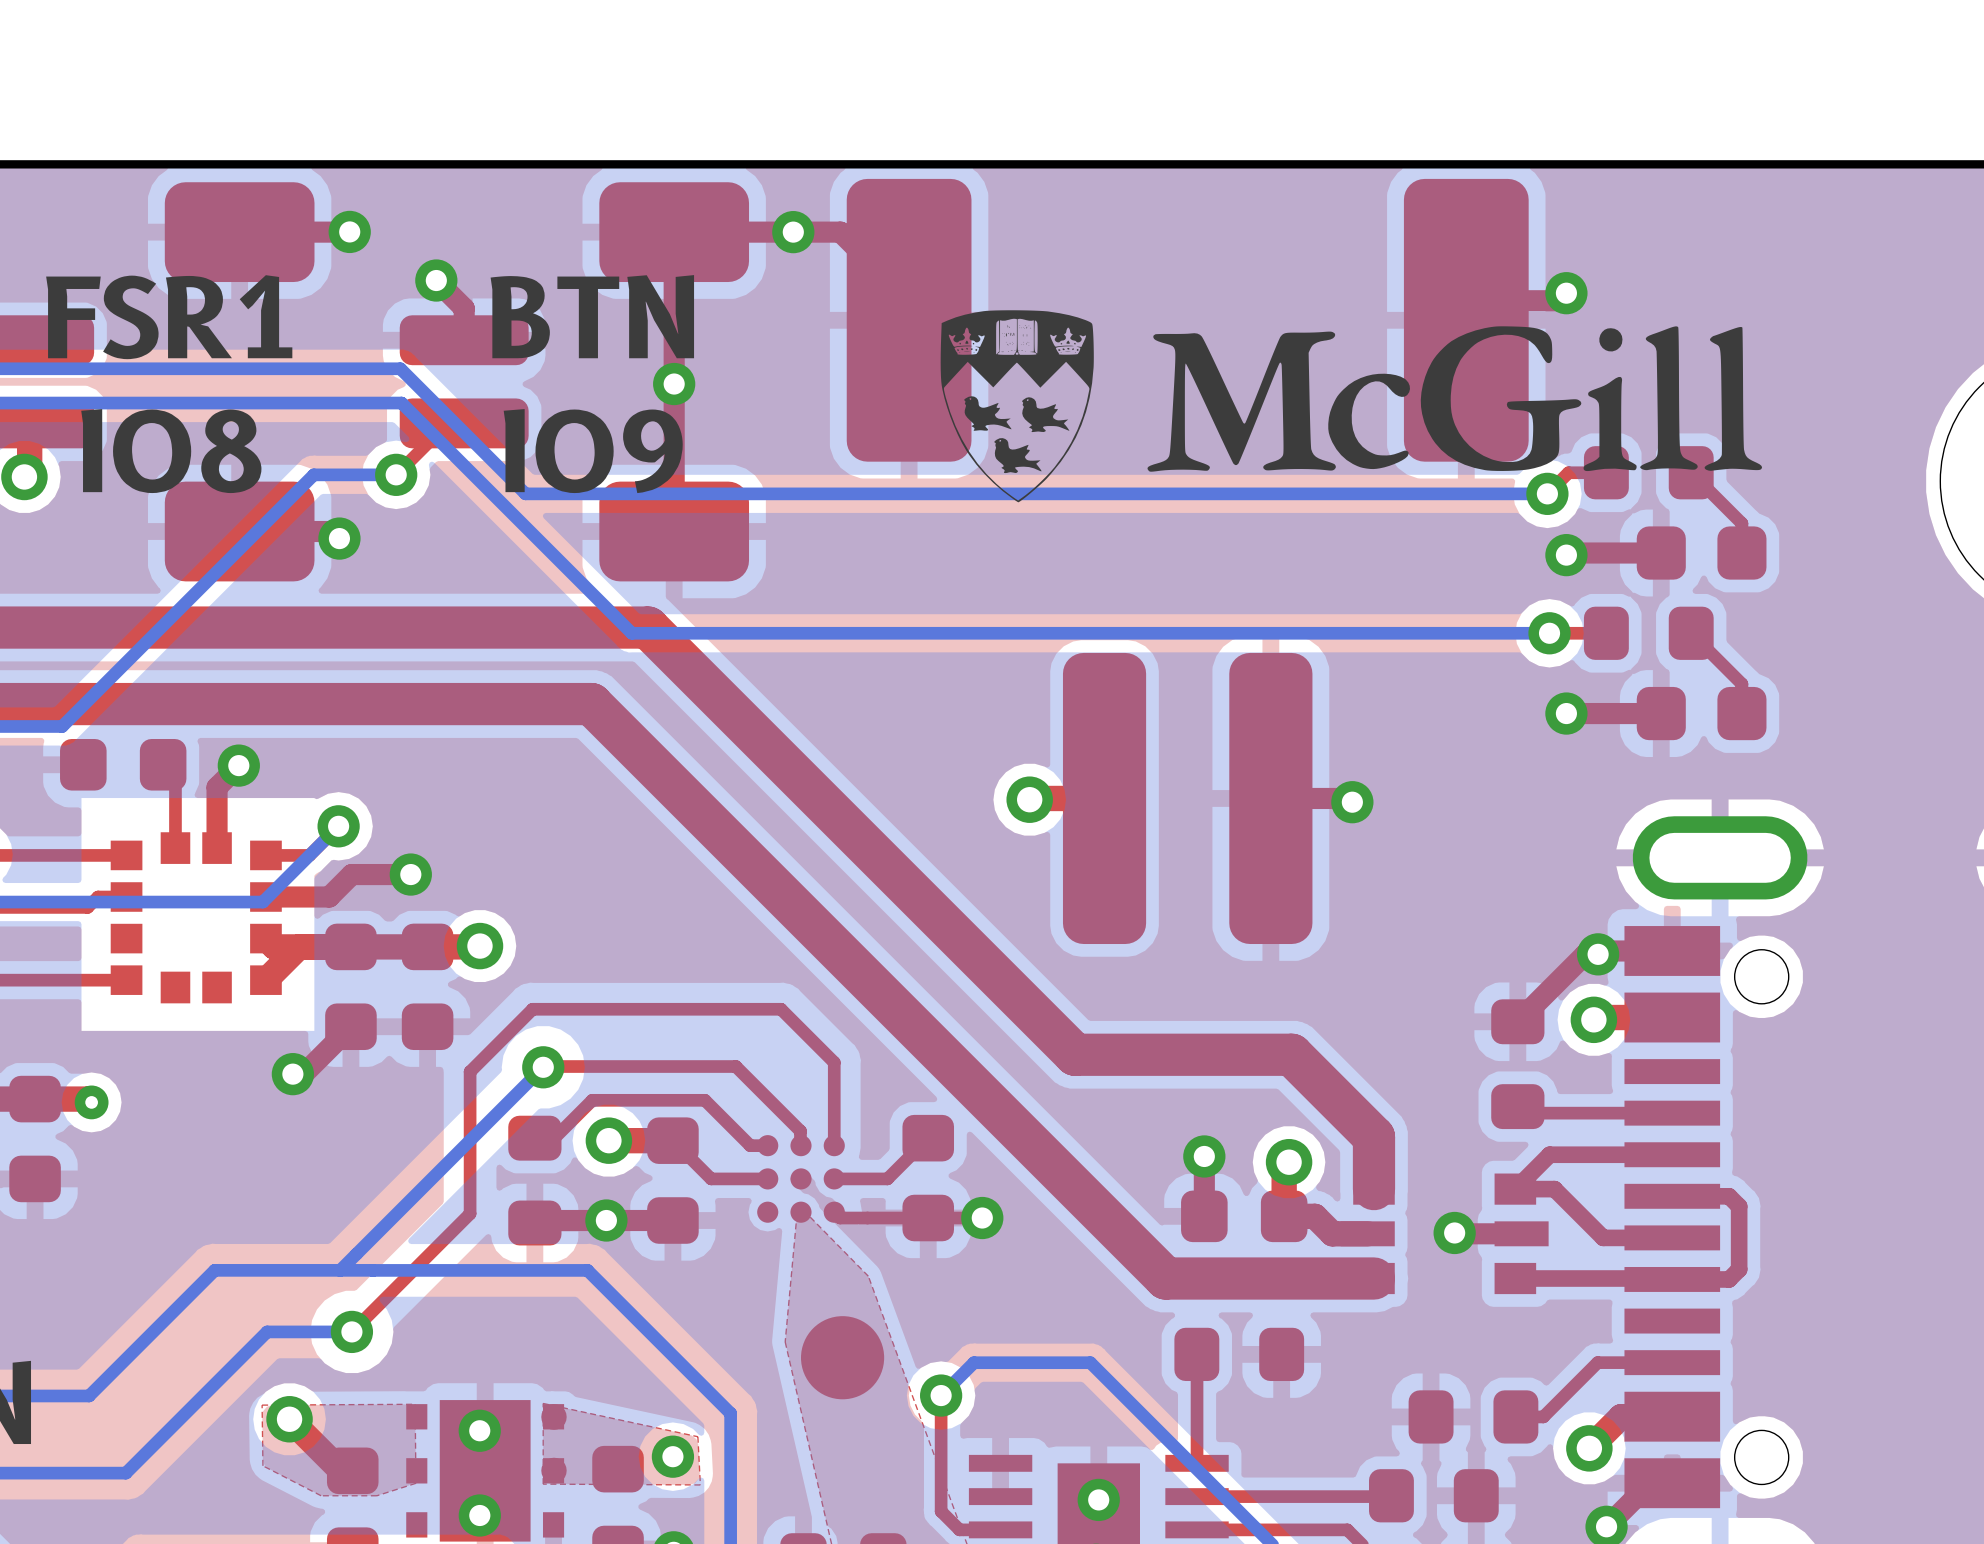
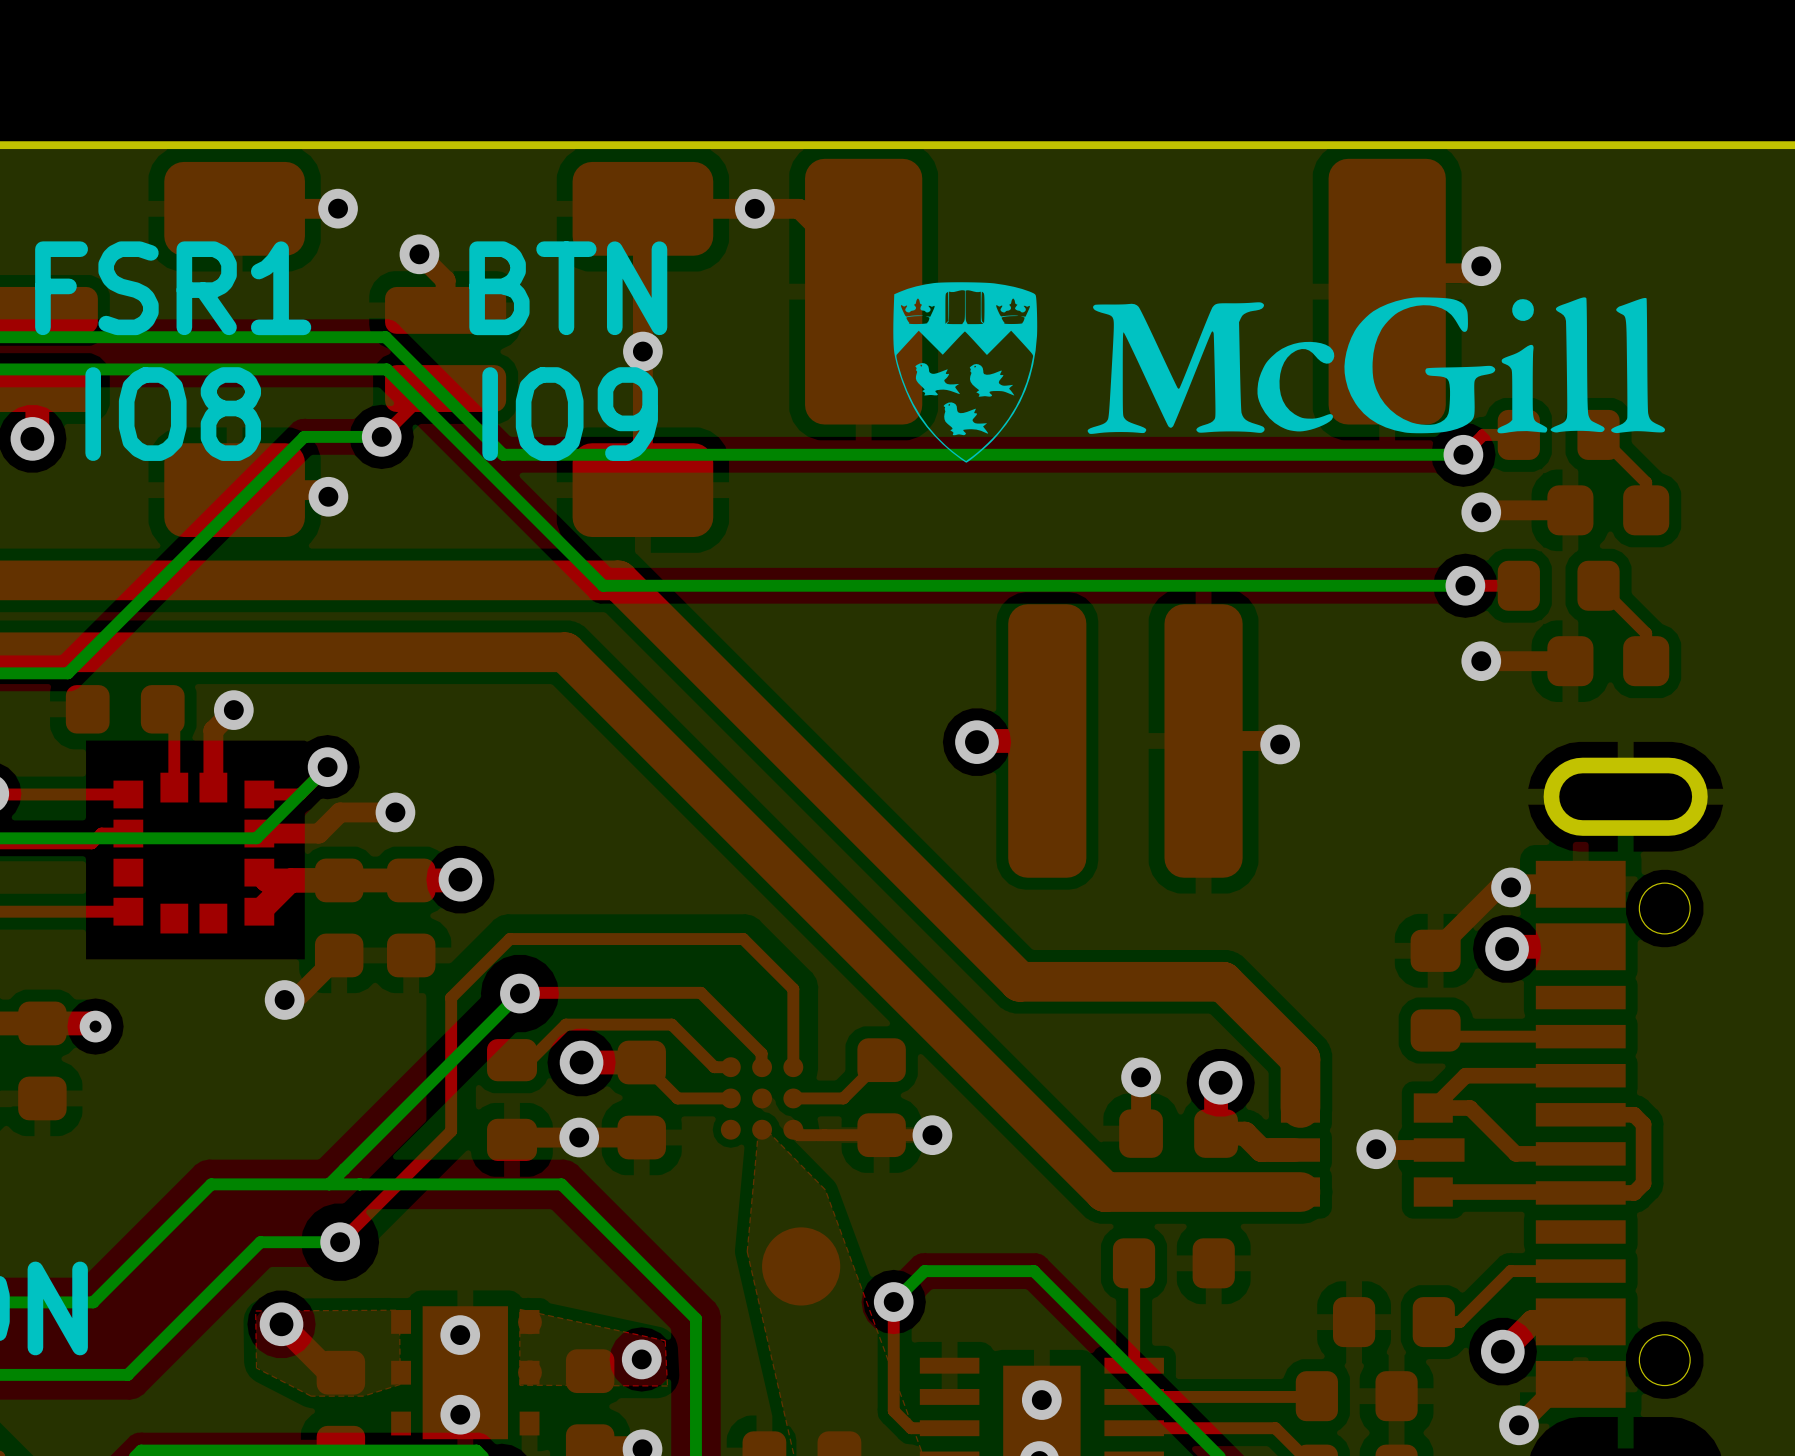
drawing shape: [940, 310, 1763, 503] -> [893, 282, 1666, 463]

